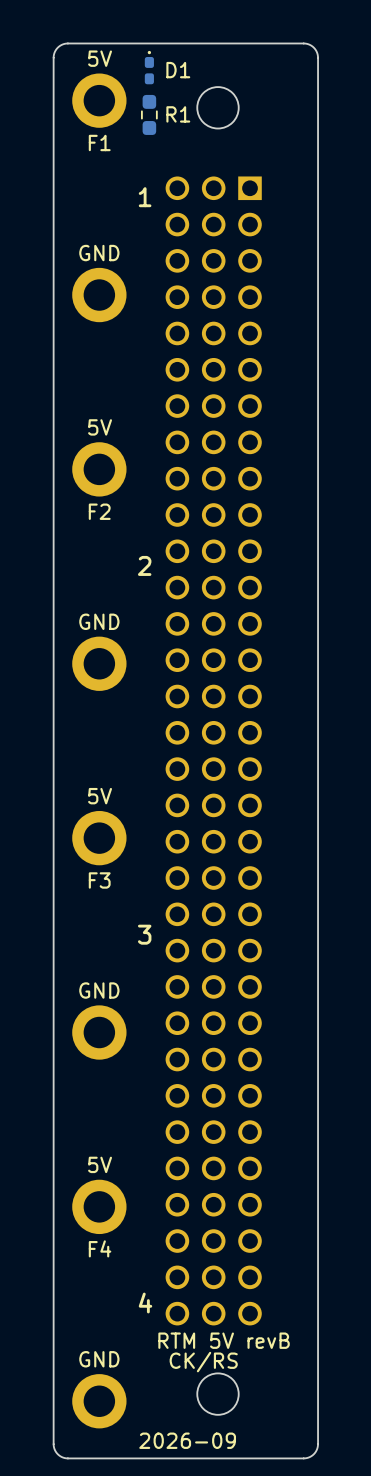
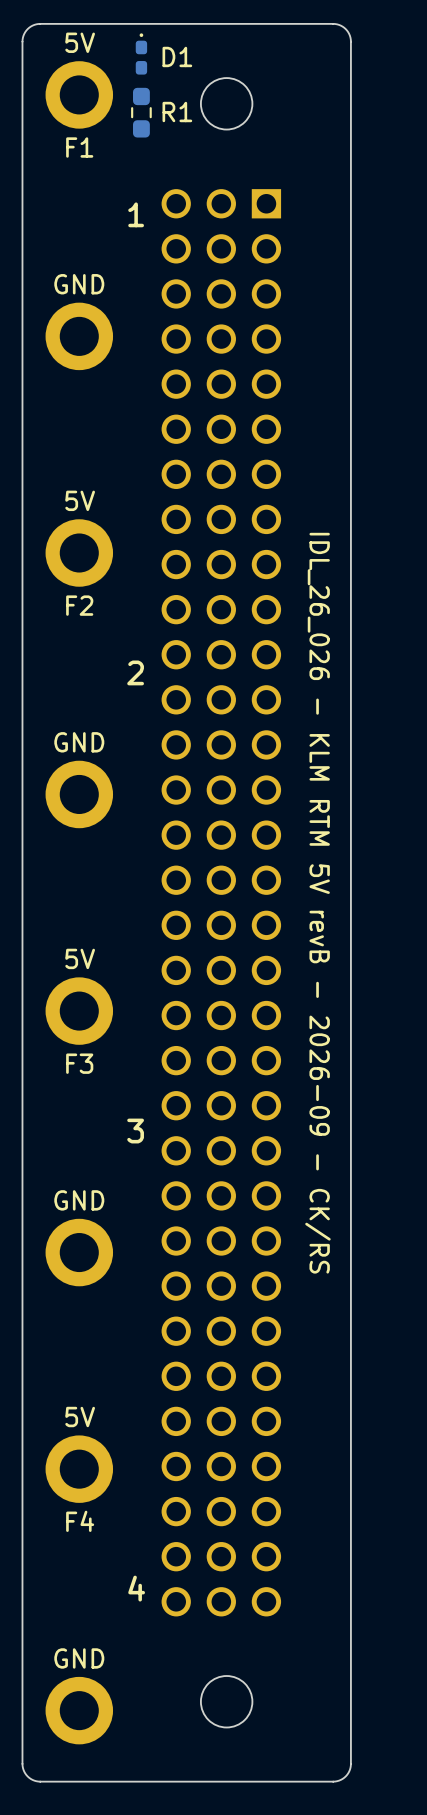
text: none -> IDL_26_026 - KLM RTM 5V revB - 2026-09 - CK/RS (317, 903)
text: RTM 5V revB (224, 1340) -> none
text: CK/RS (203, 1362) -> none
text: 2026-09 (187, 1440) -> none

